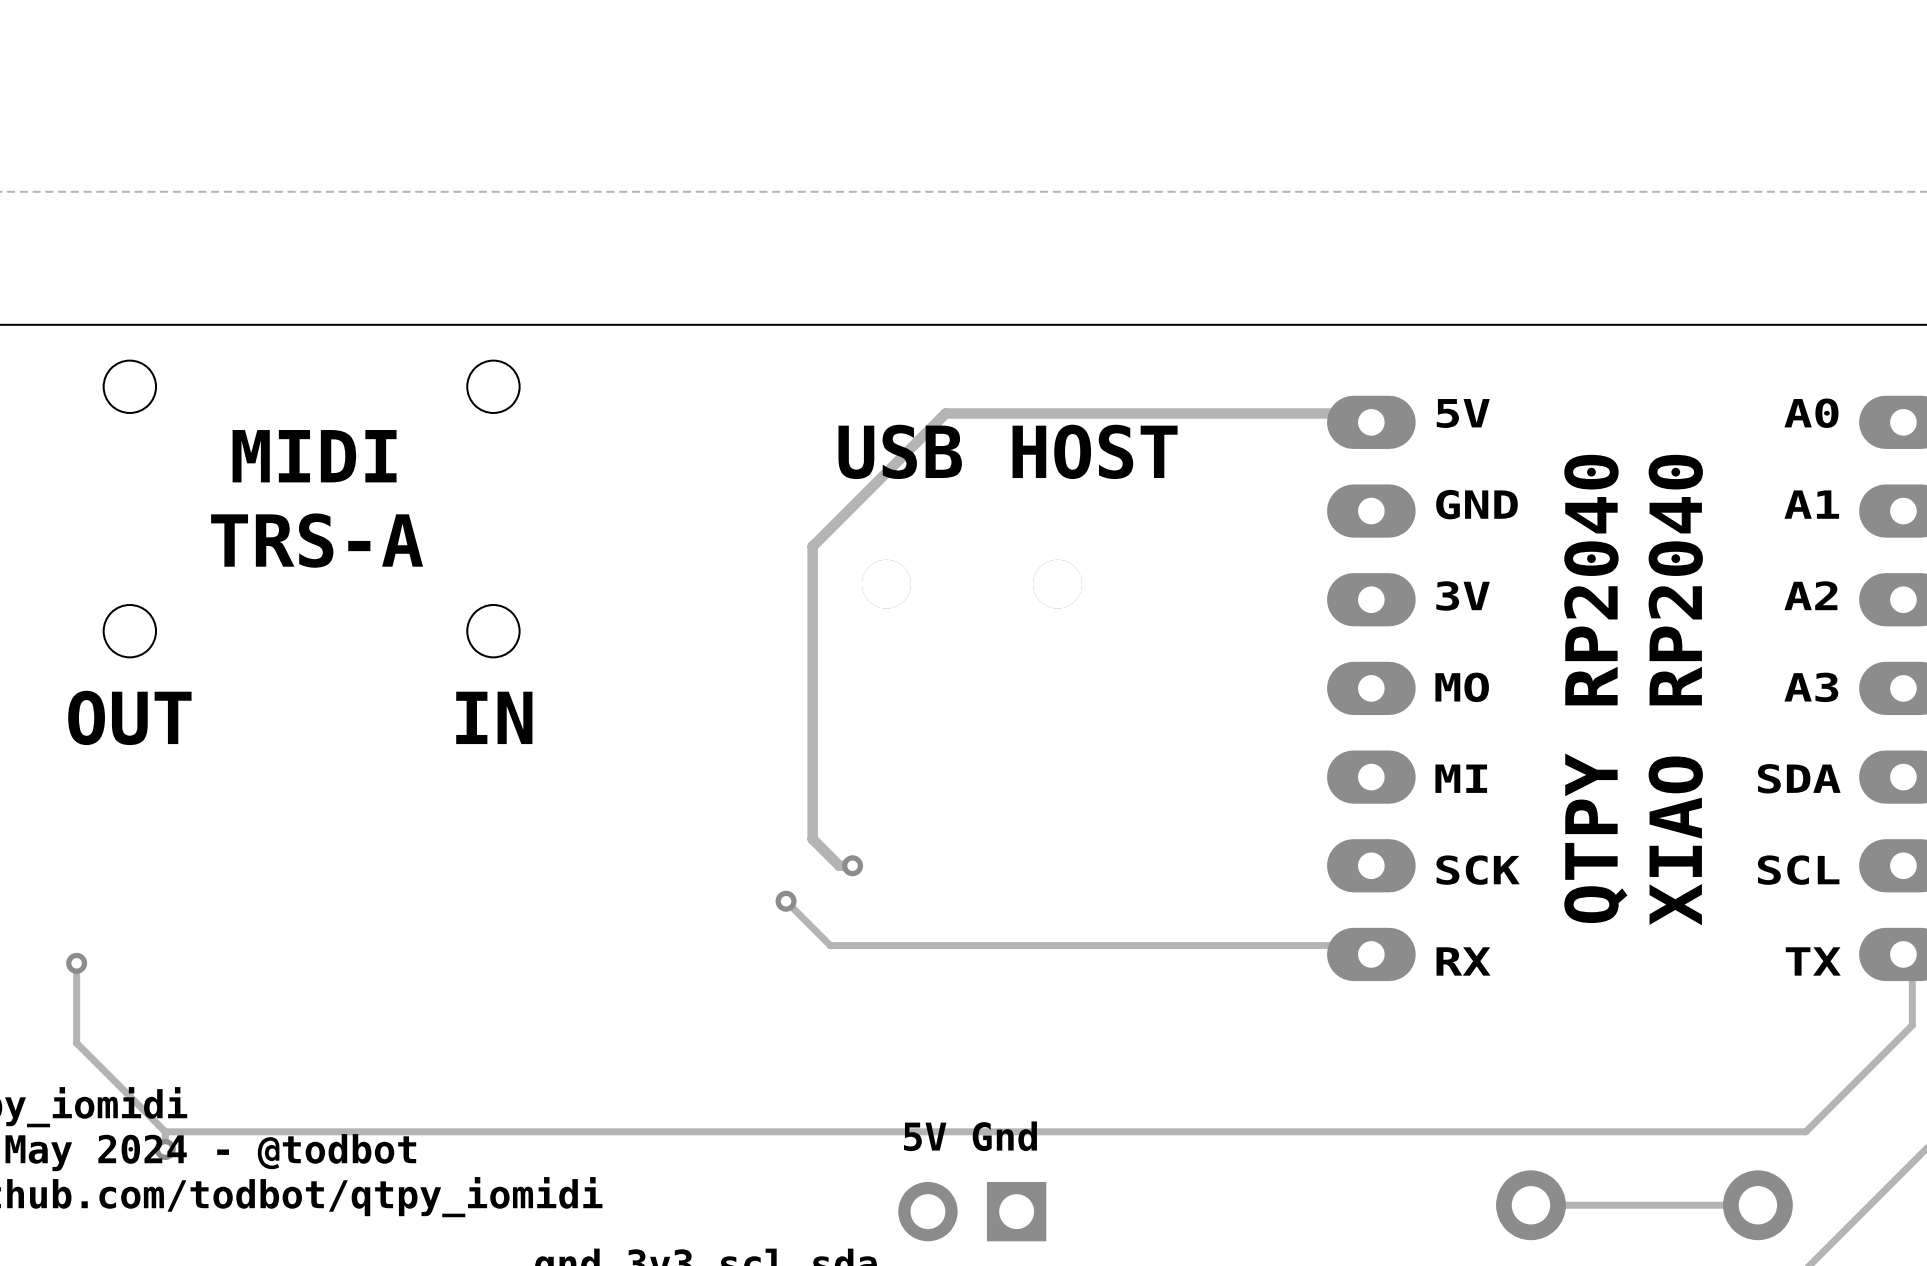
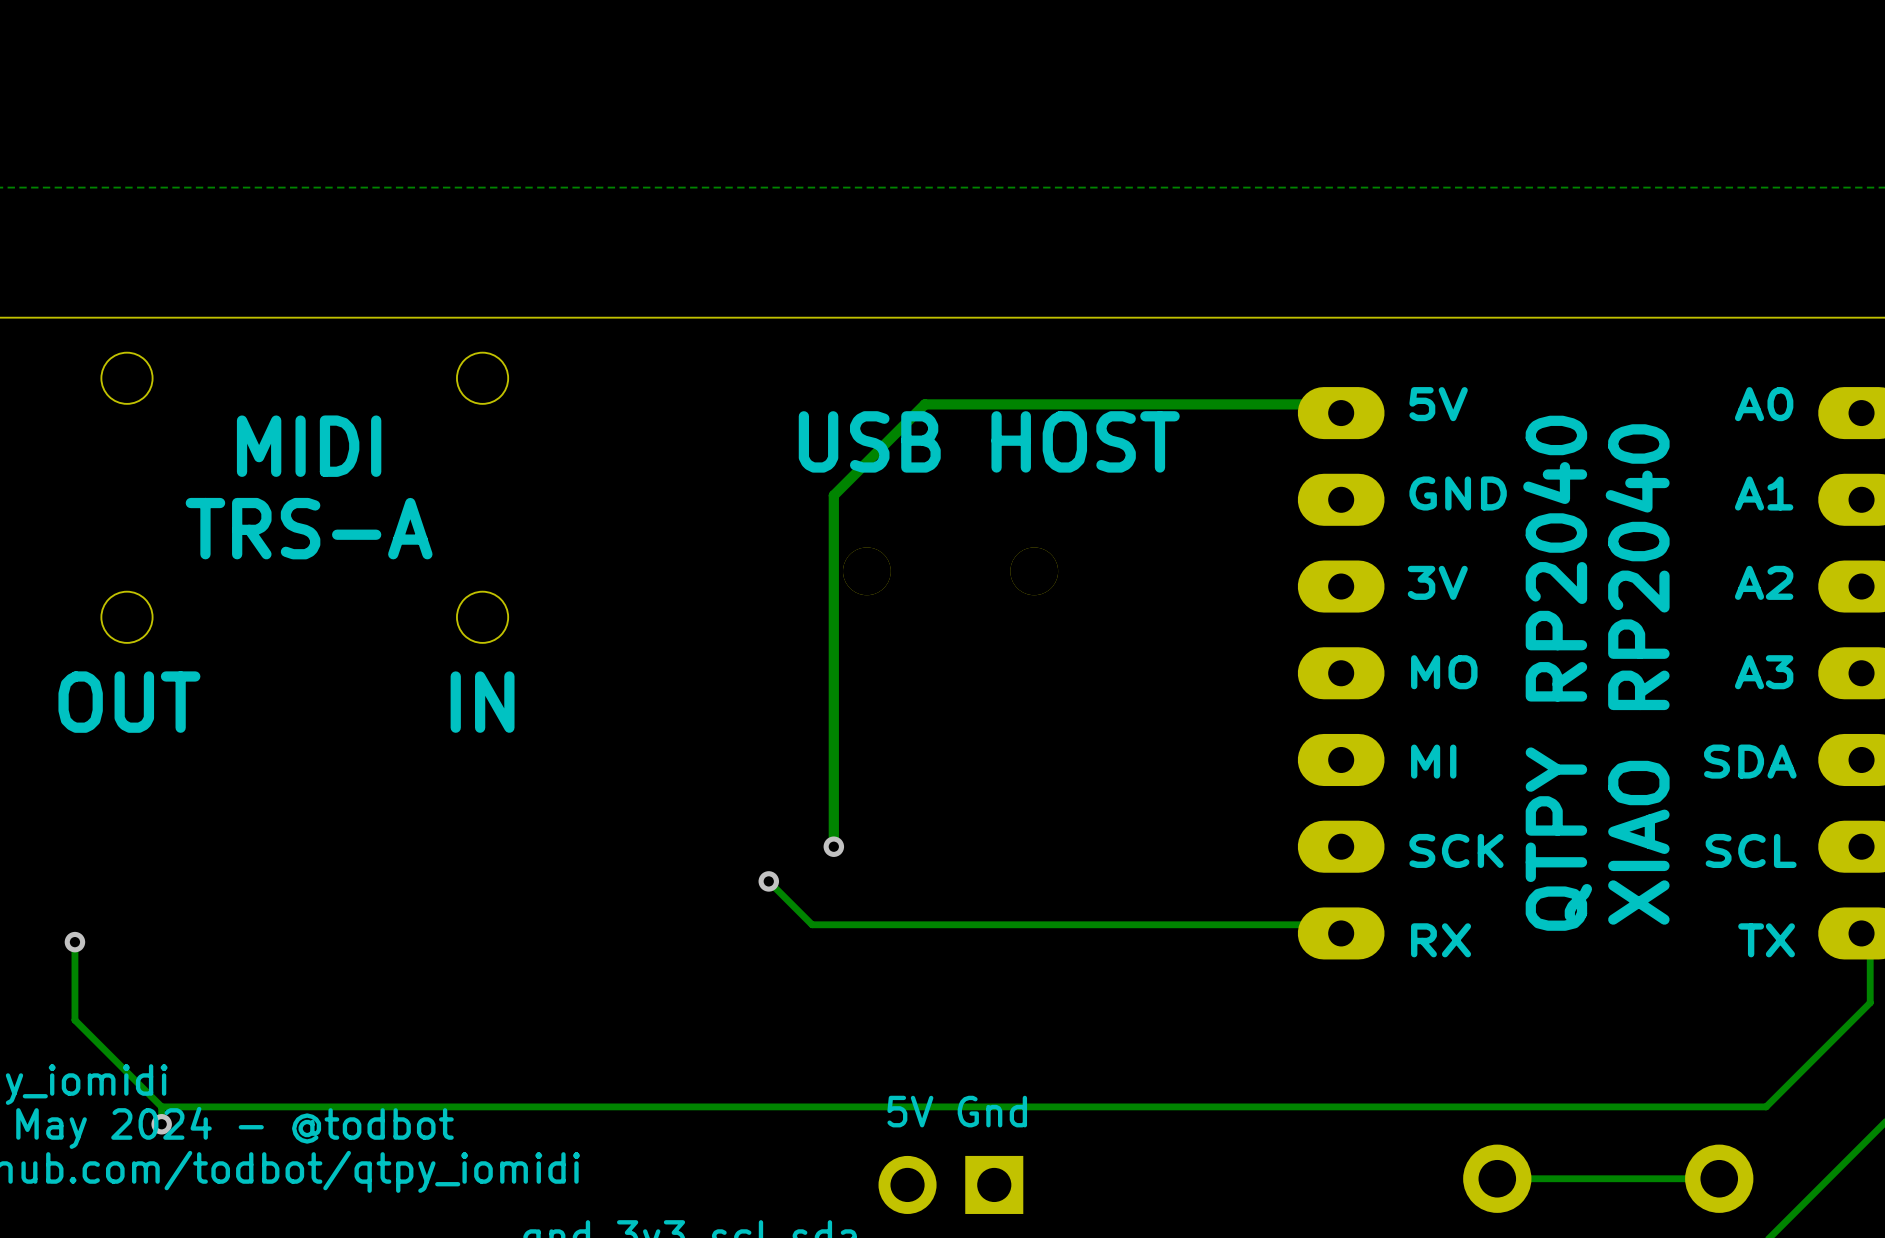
track: (852, 506) (812, 546) (812, 839) (839, 865) (852, 865) -> (833, 495) (833, 846)

